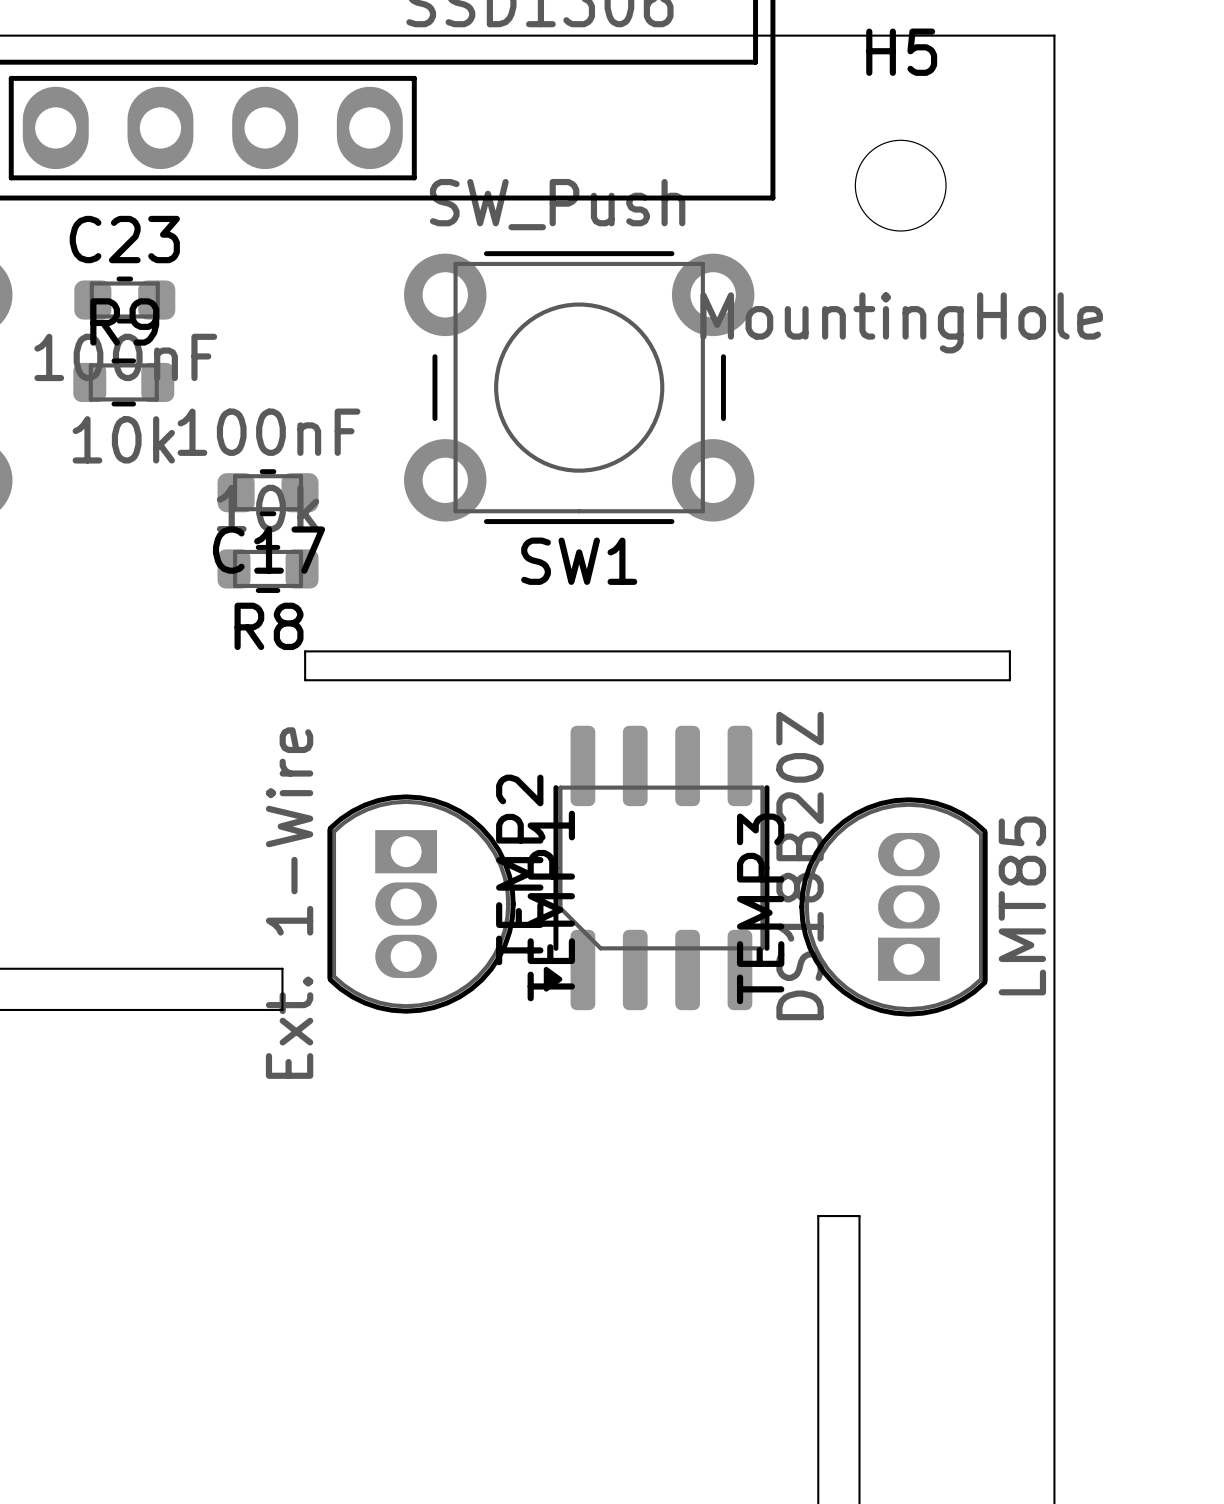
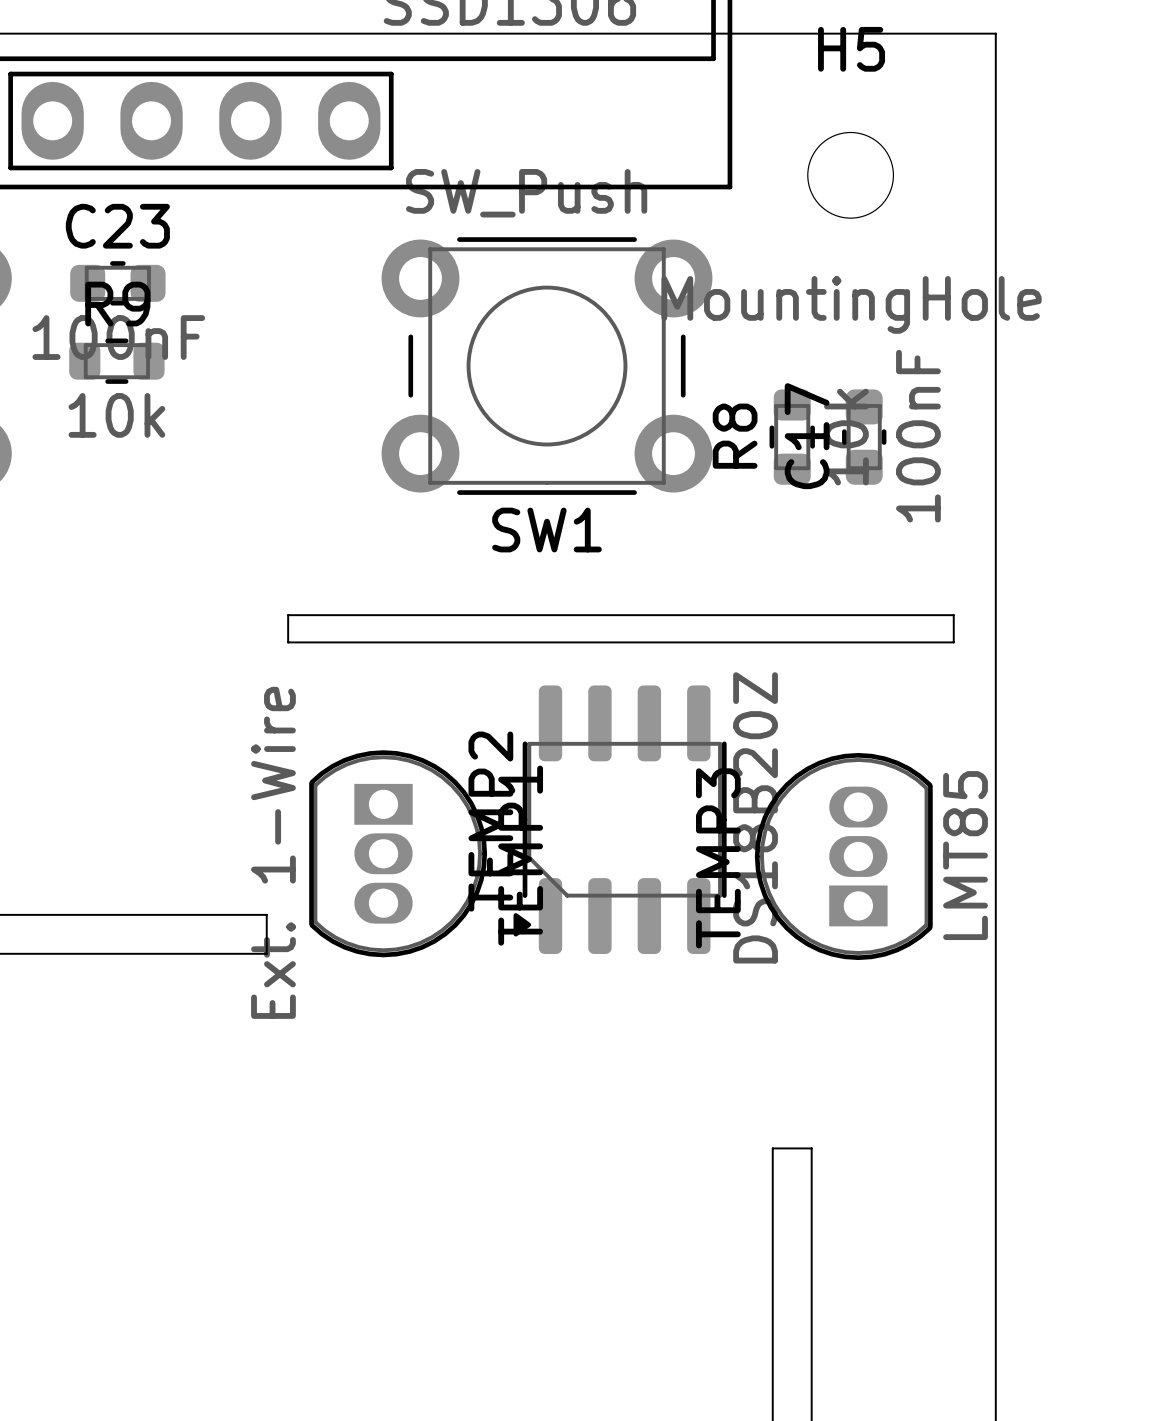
C17 rotation: 0° (268, 492) -> 90° clockwise (864, 437)
C17 position: (268, 492) -> (864, 437)
R8 rotation: 0° (268, 568) -> 90° clockwise (792, 437)
R8 position: (268, 568) -> (792, 437)

